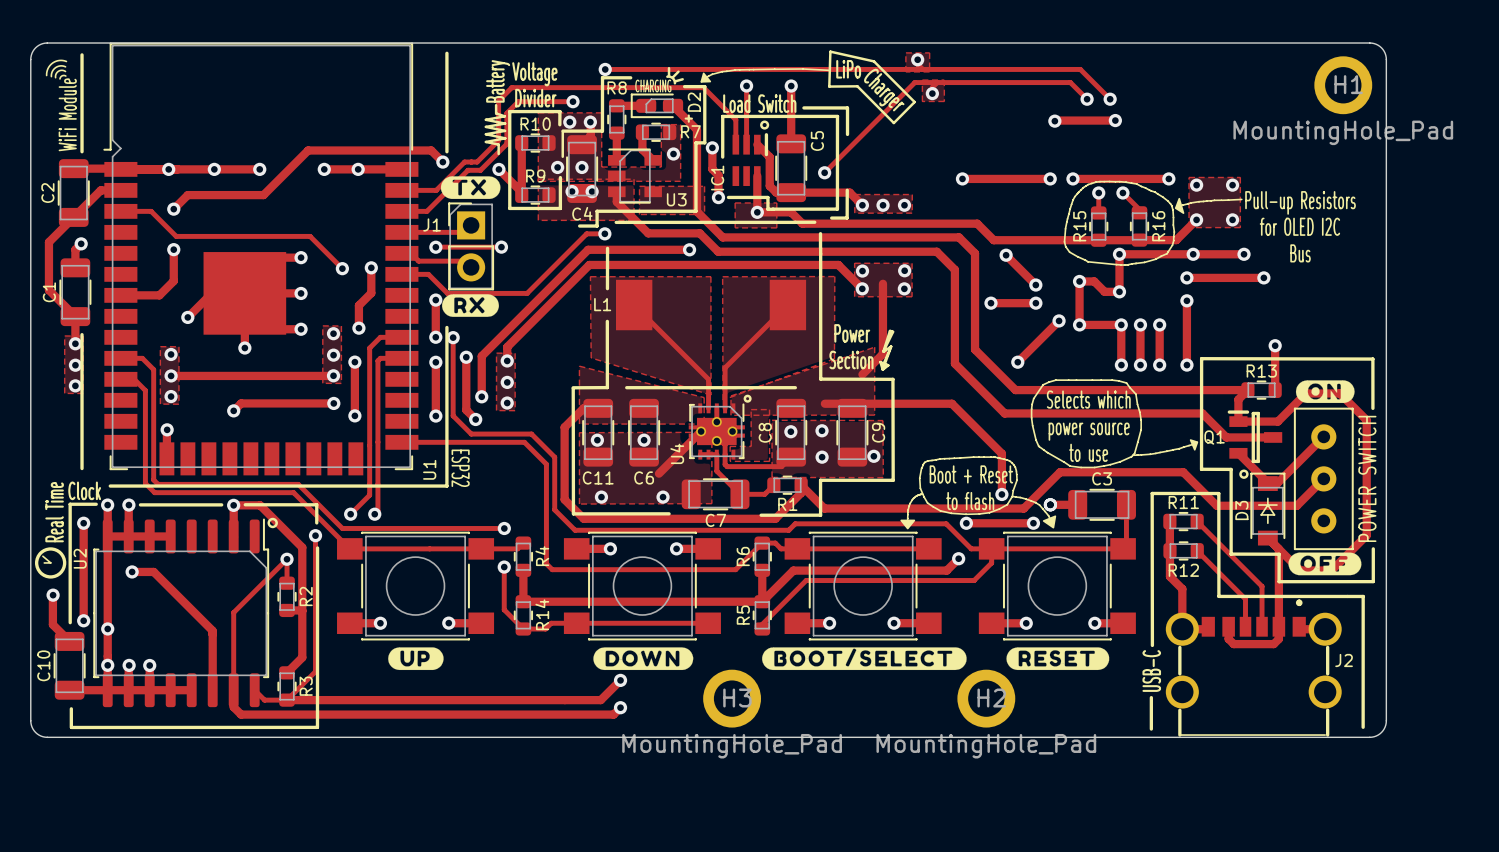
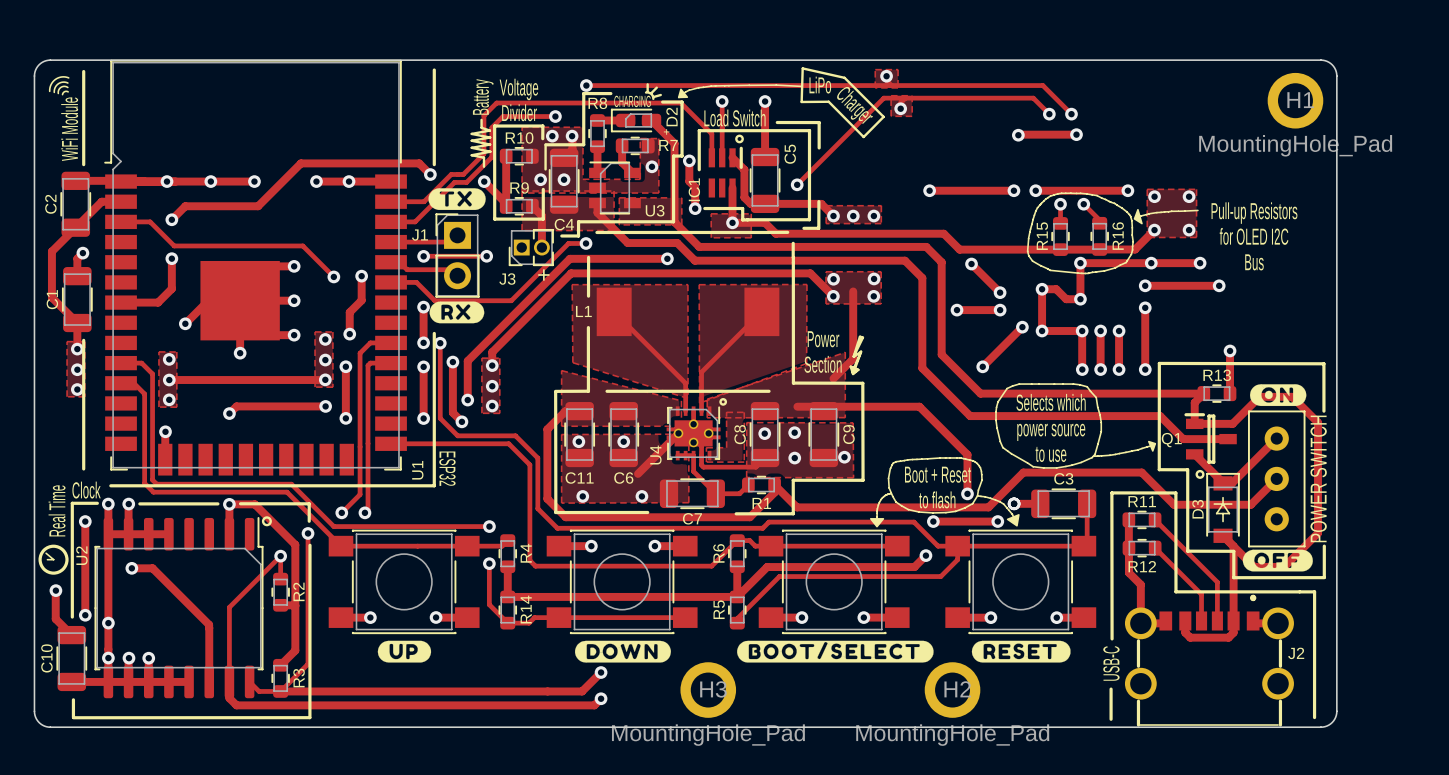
via: (572, 191) -> none
via: (592, 191) -> none
track: none -> (532, 206) (541, 215) (542, 246)
J3: none -> (531, 247)
text: none -> + (543, 274)

